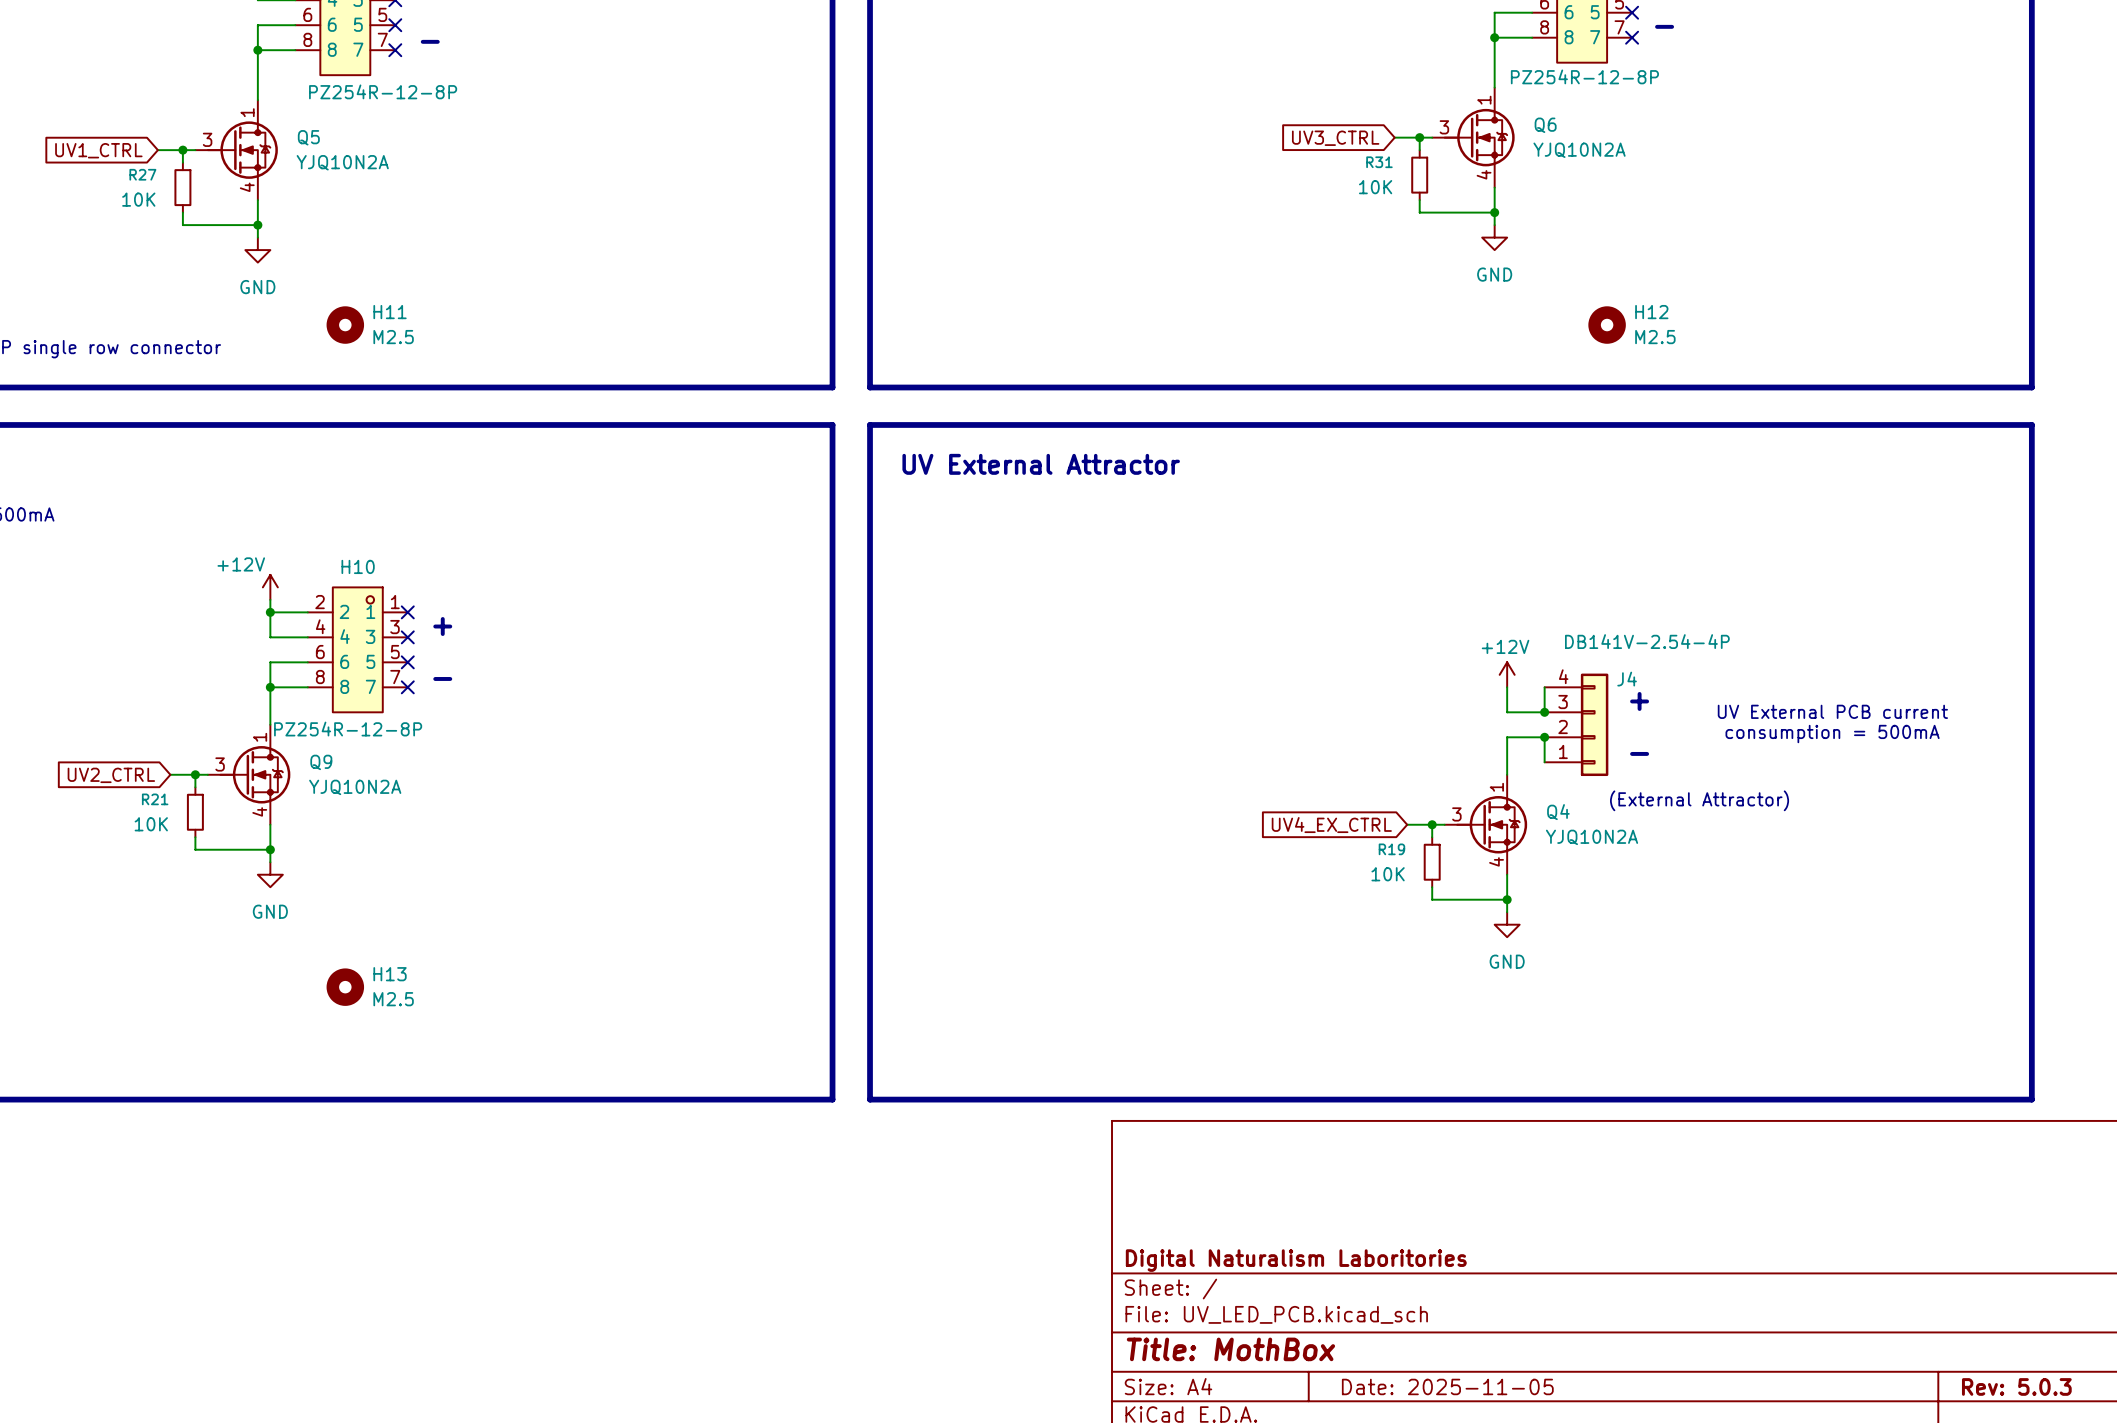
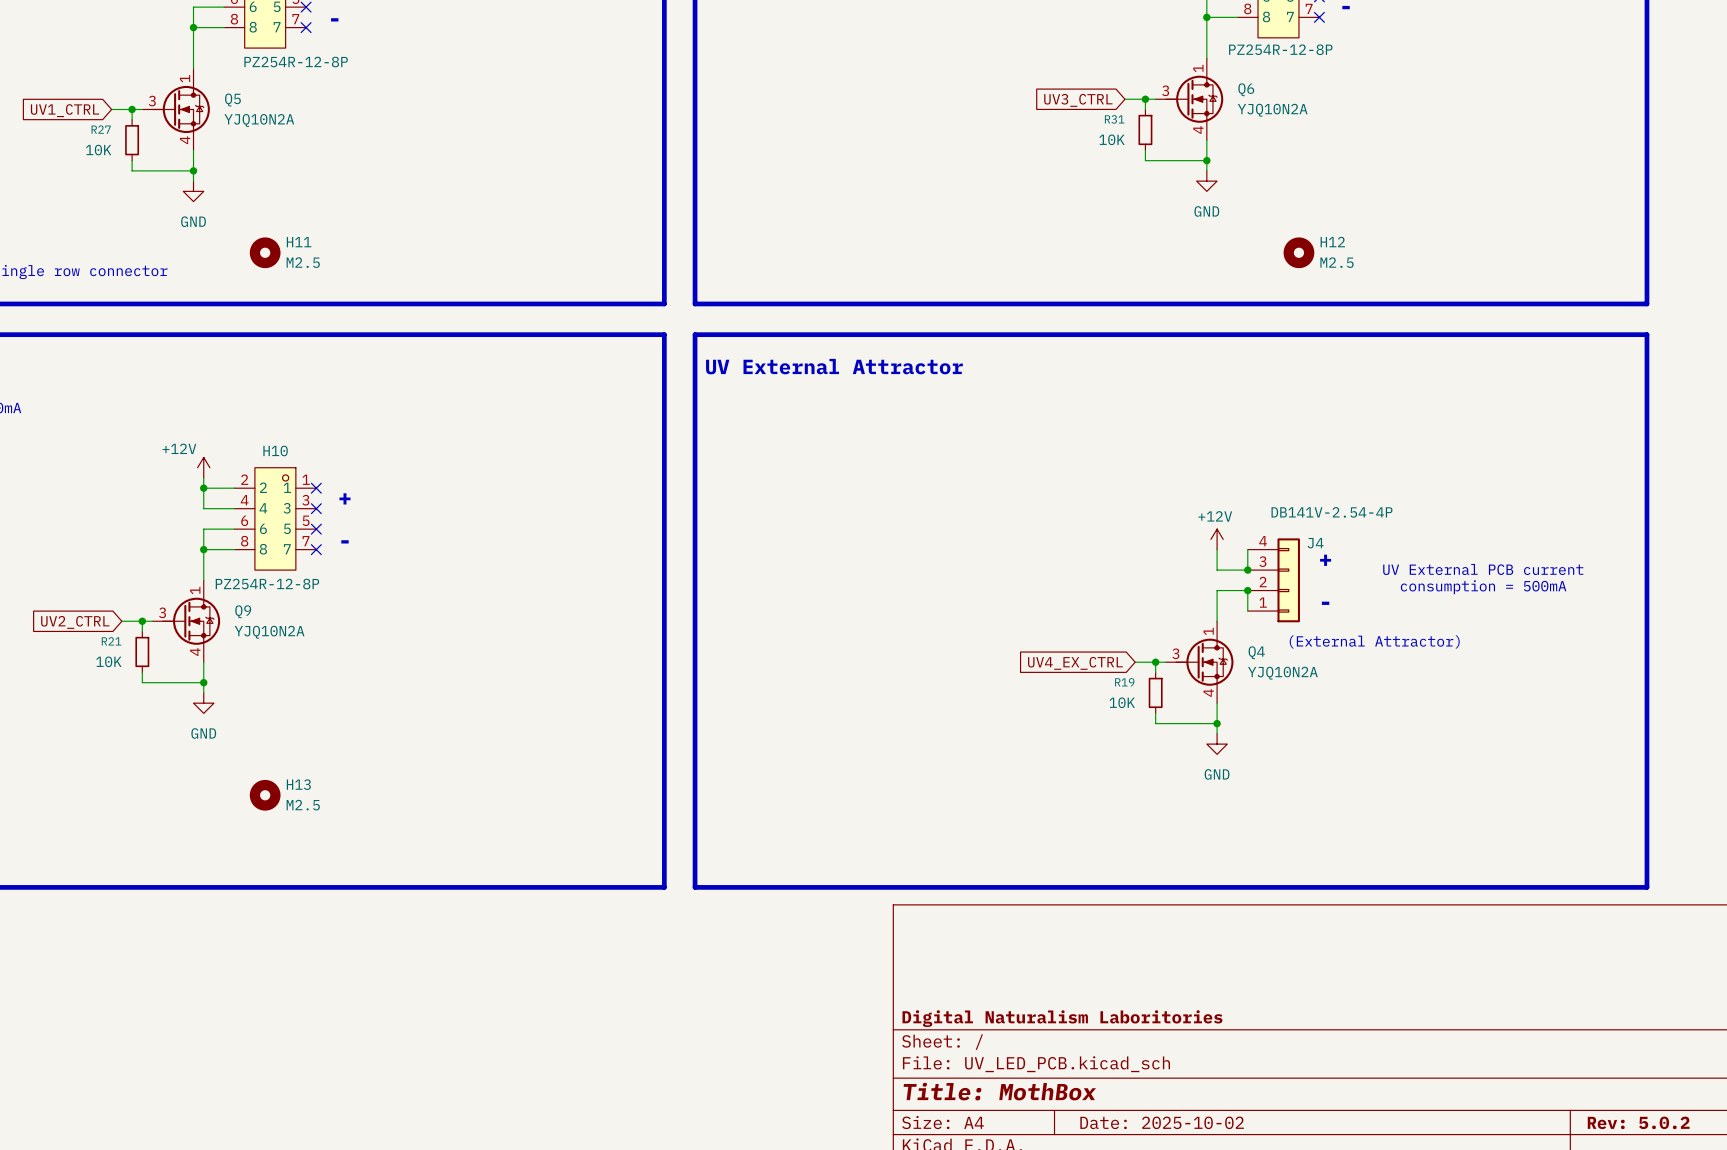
title block: Date: 2025-11-05 (1447, 1386) -> Date: 2025-10-02 (1162, 1122)
title block: Rev: 5.0.3 (2016, 1386) -> Rev: 5.0.2 (1638, 1122)

